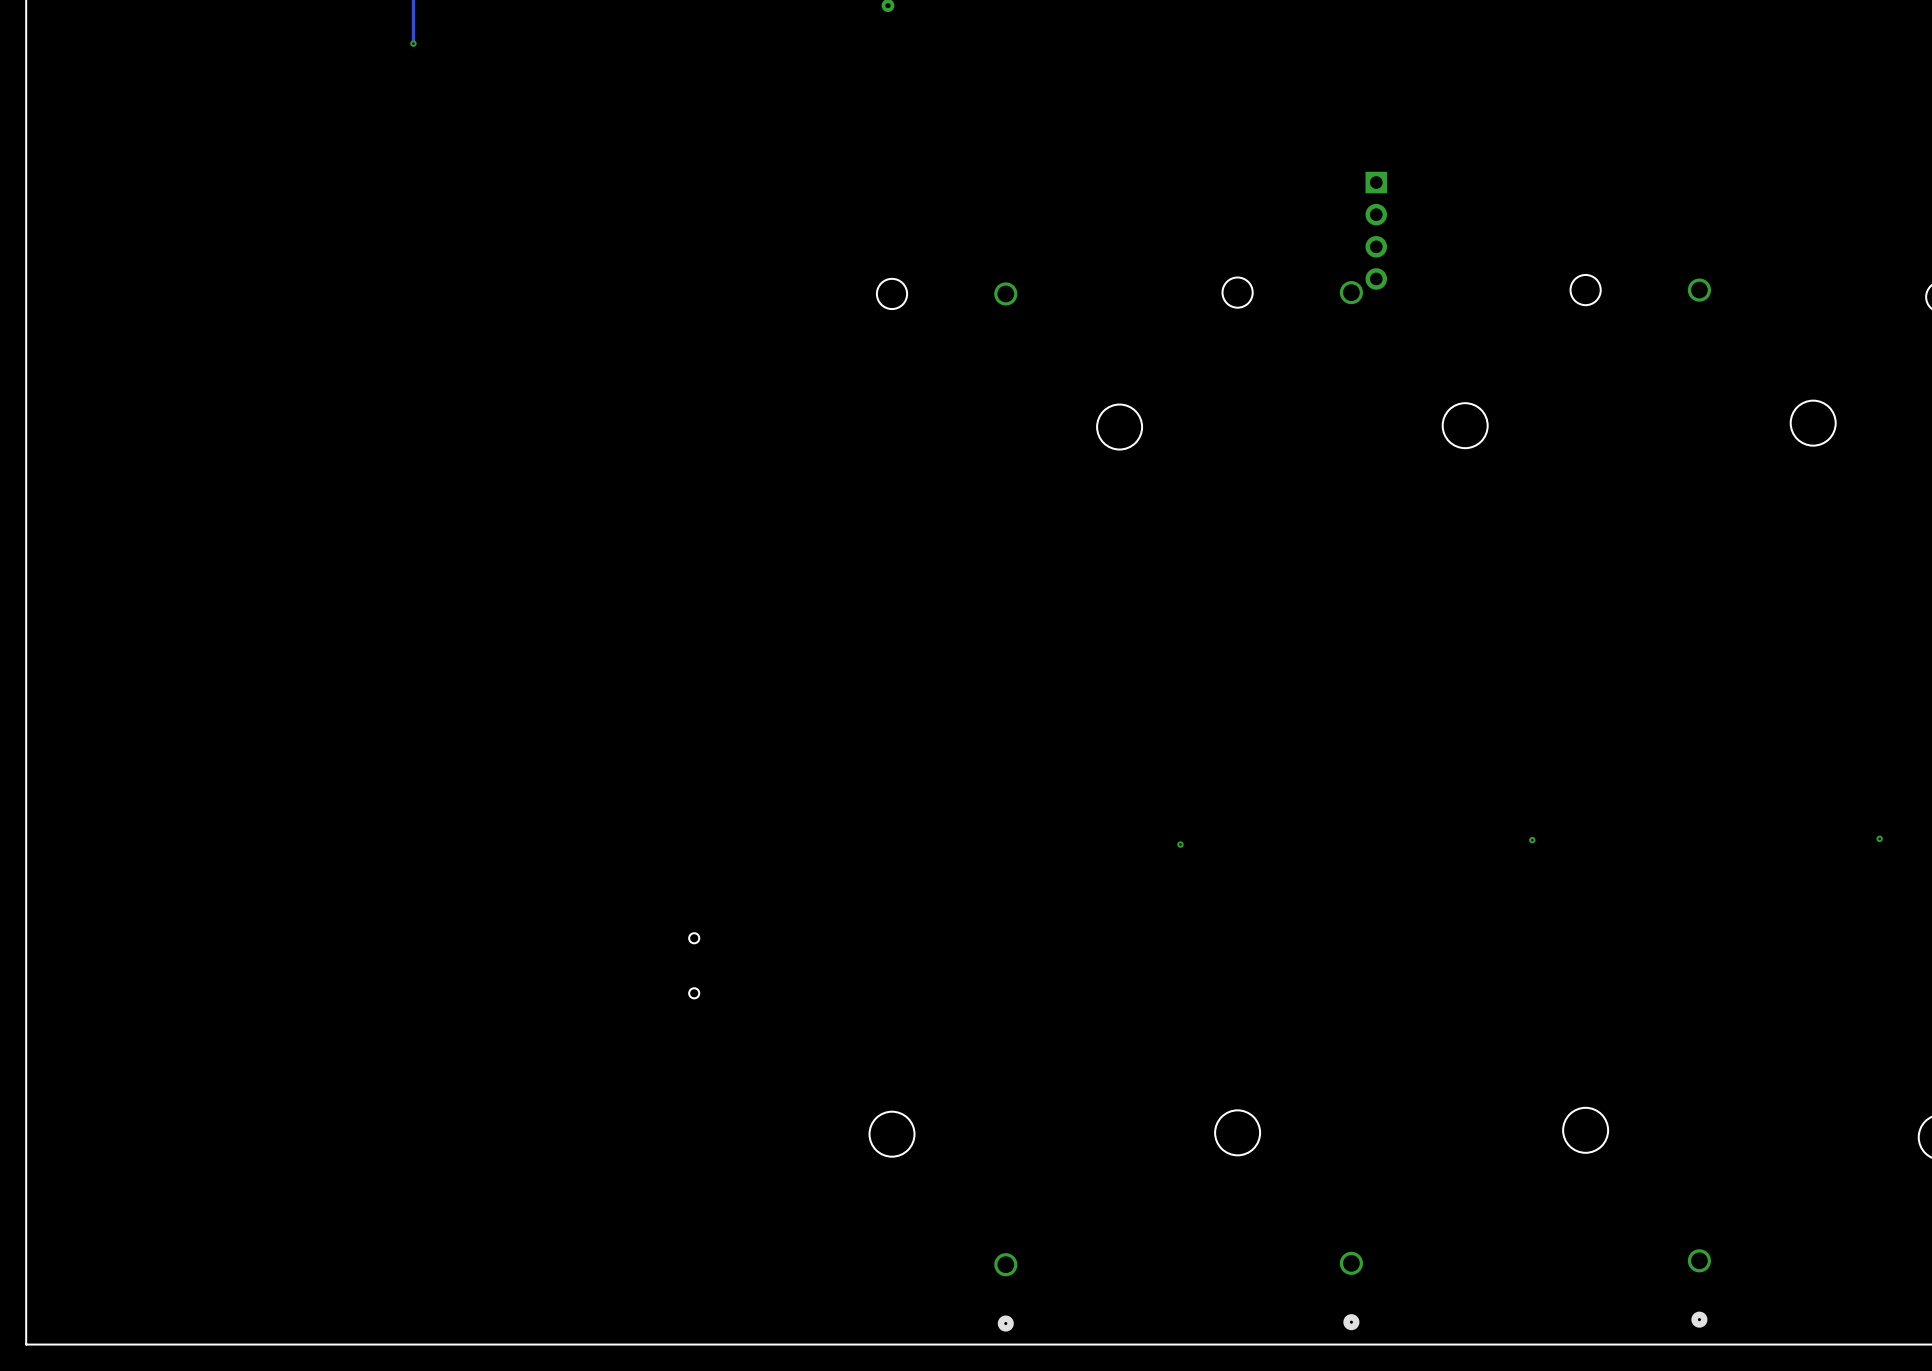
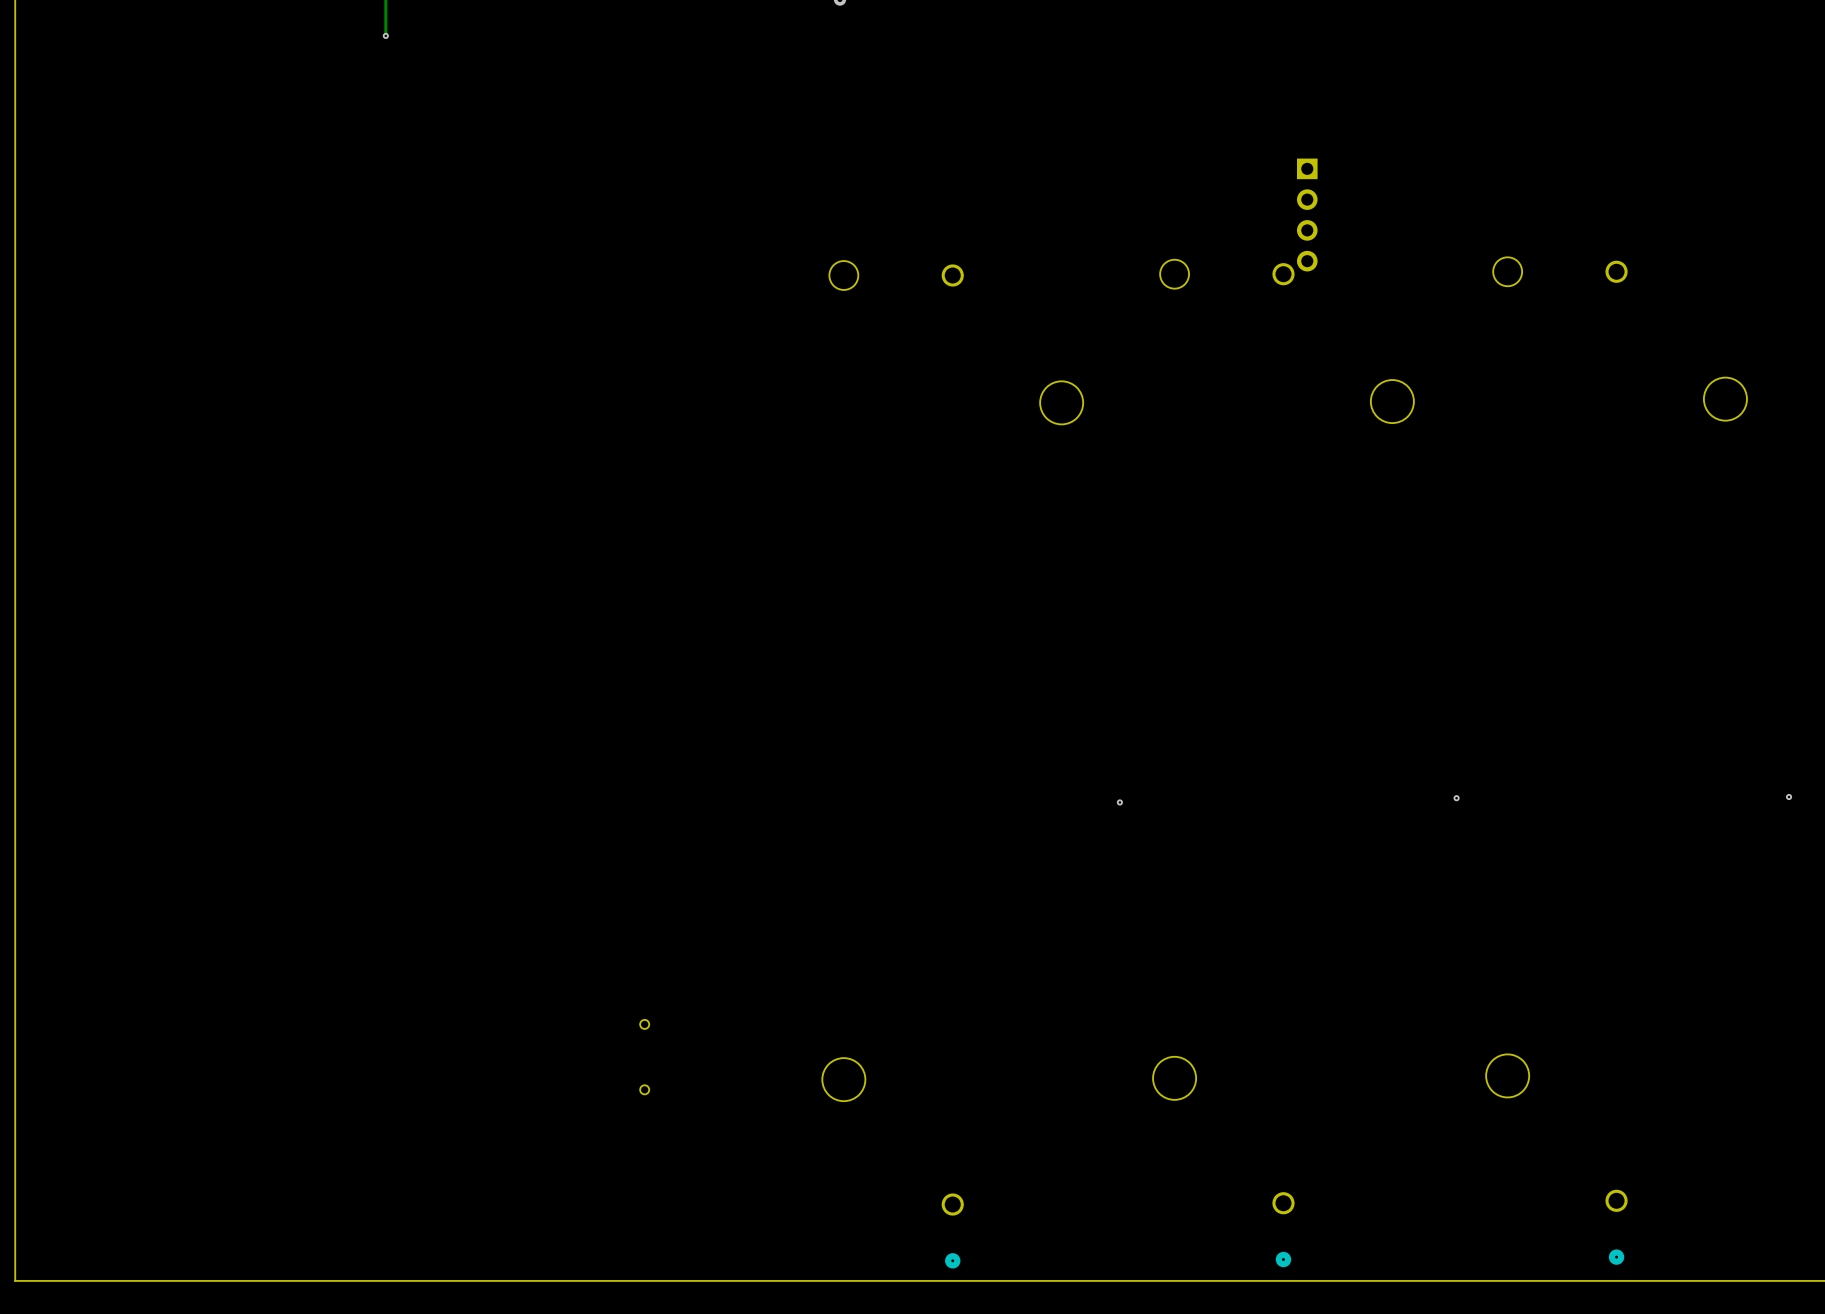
part: (694, 938) -> none
part: (694, 993) -> none
part: none -> (644, 1024)
part: none -> (644, 1089)

